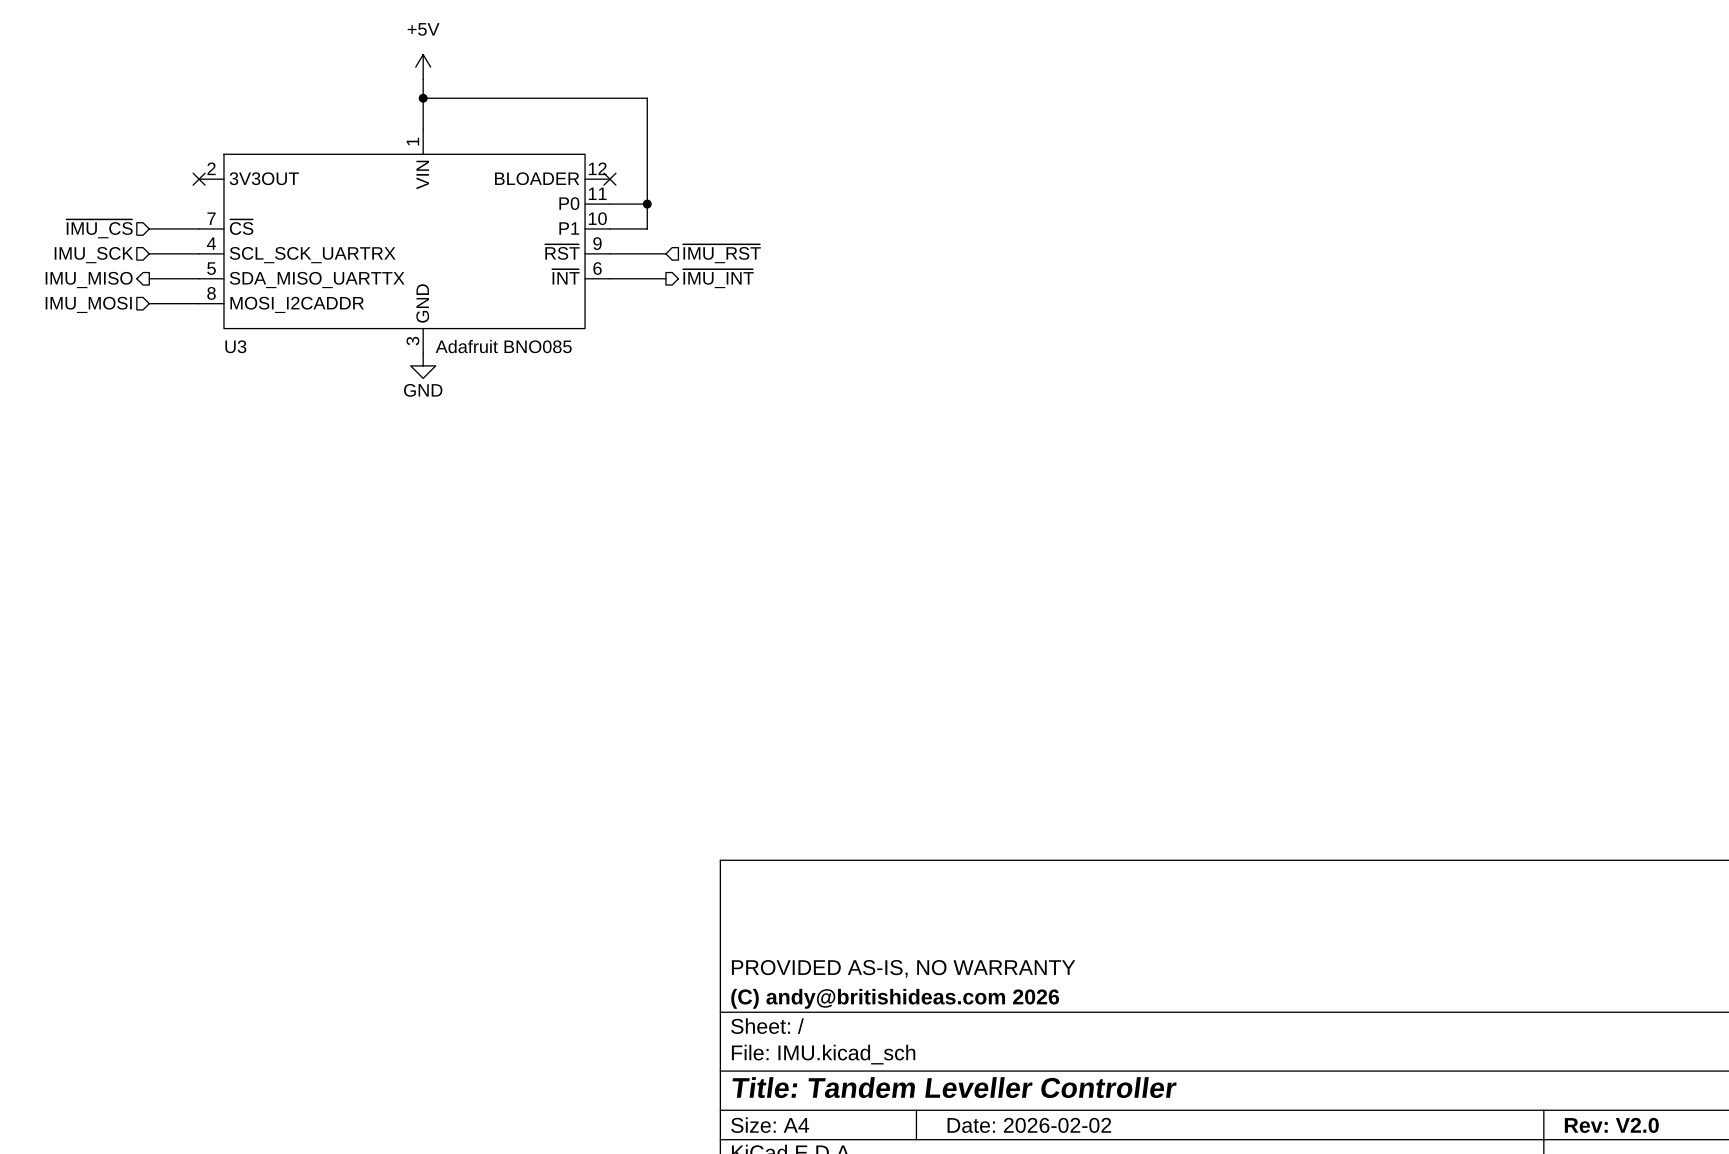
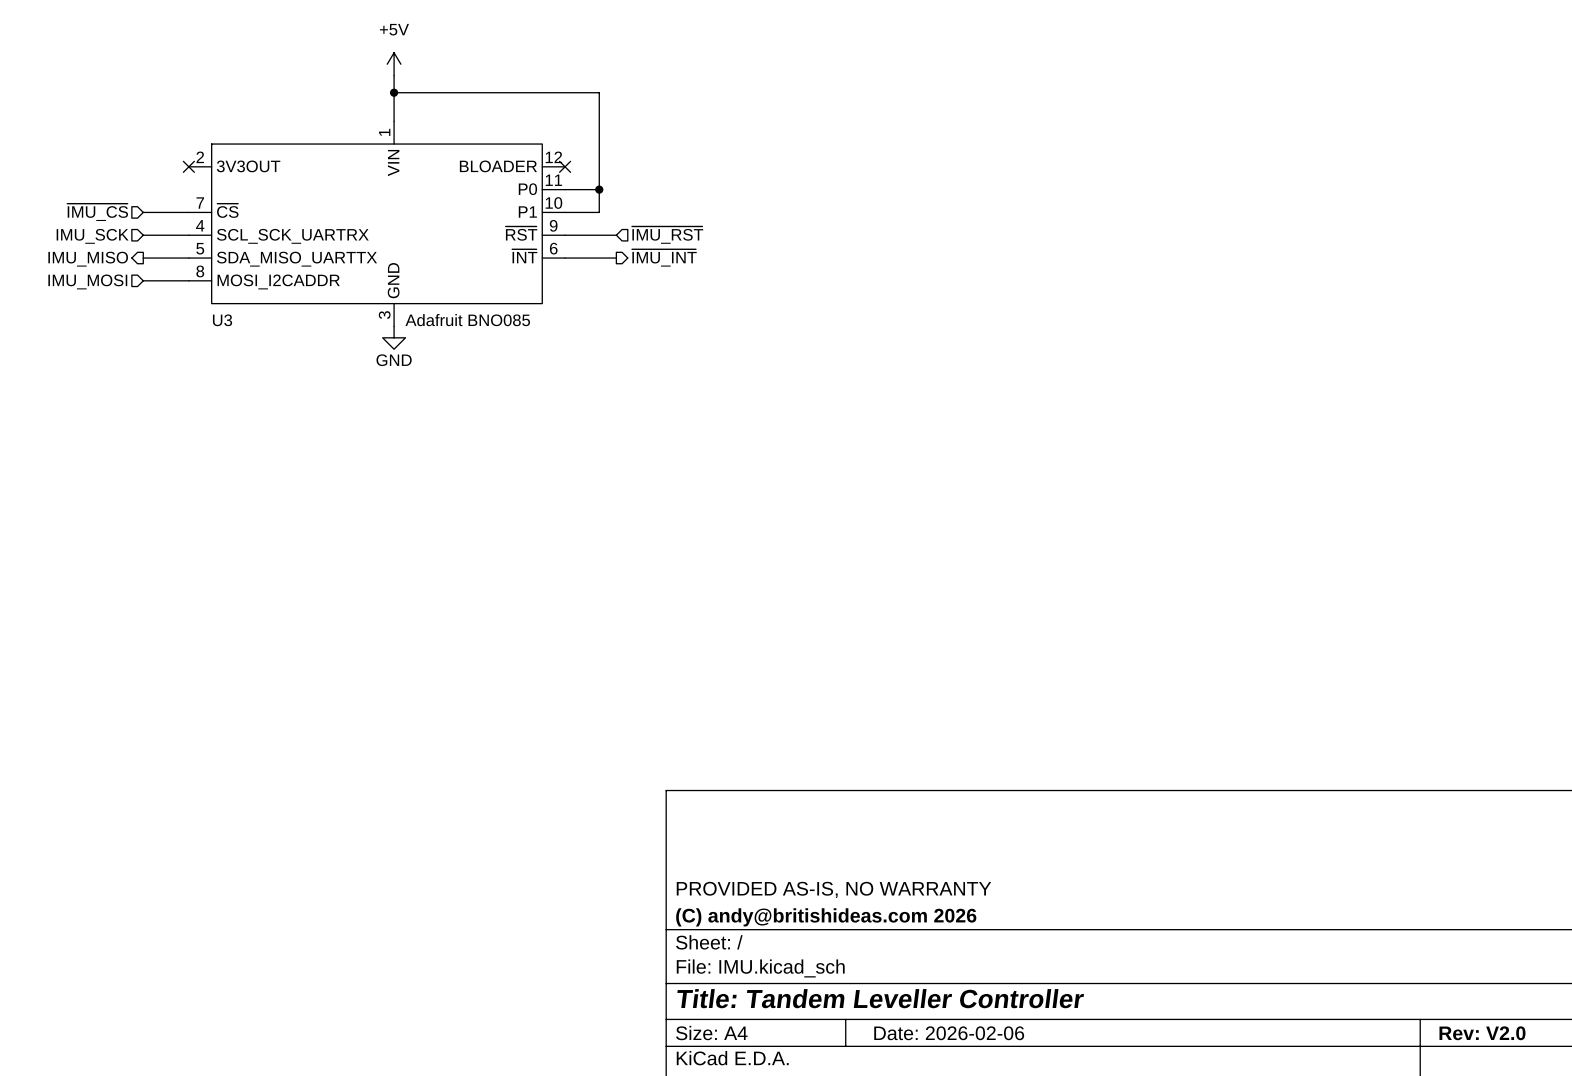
title block: Date: 2026-02-02 (1029, 1125) -> Date: 2026-02-06 (949, 1033)

